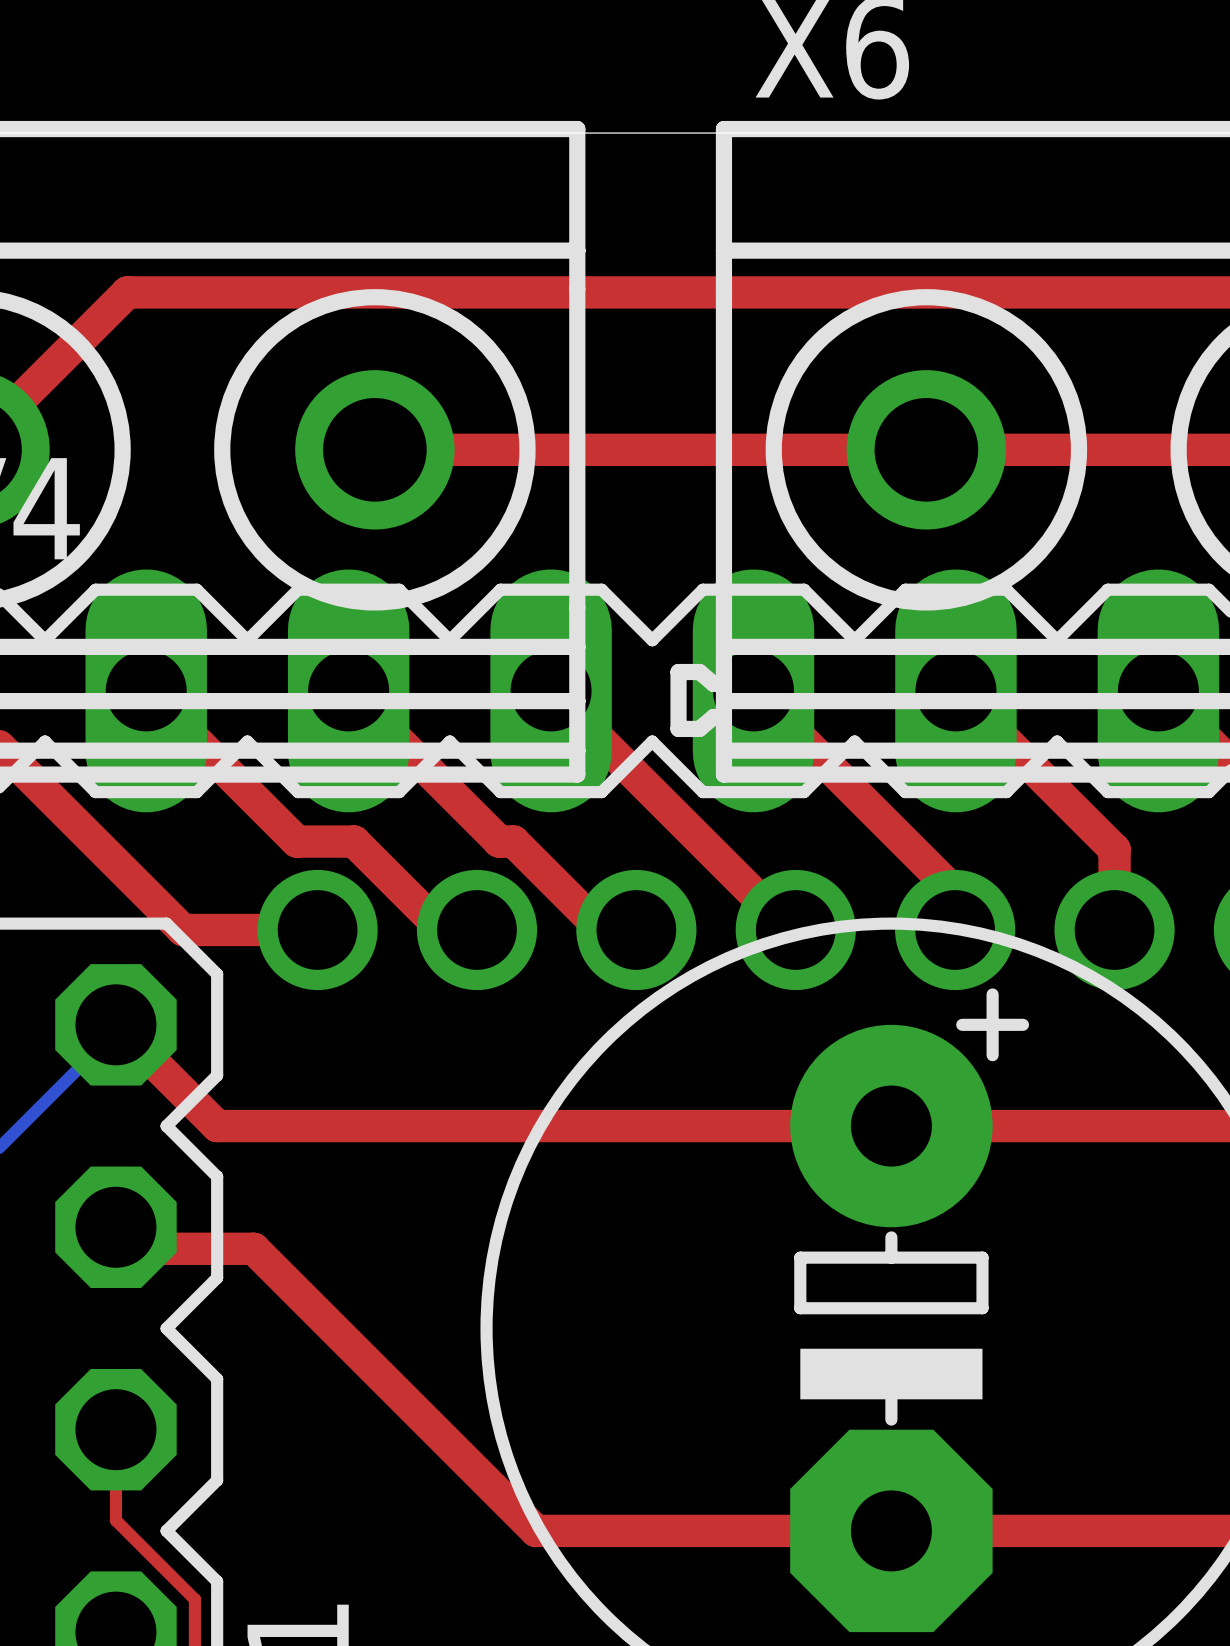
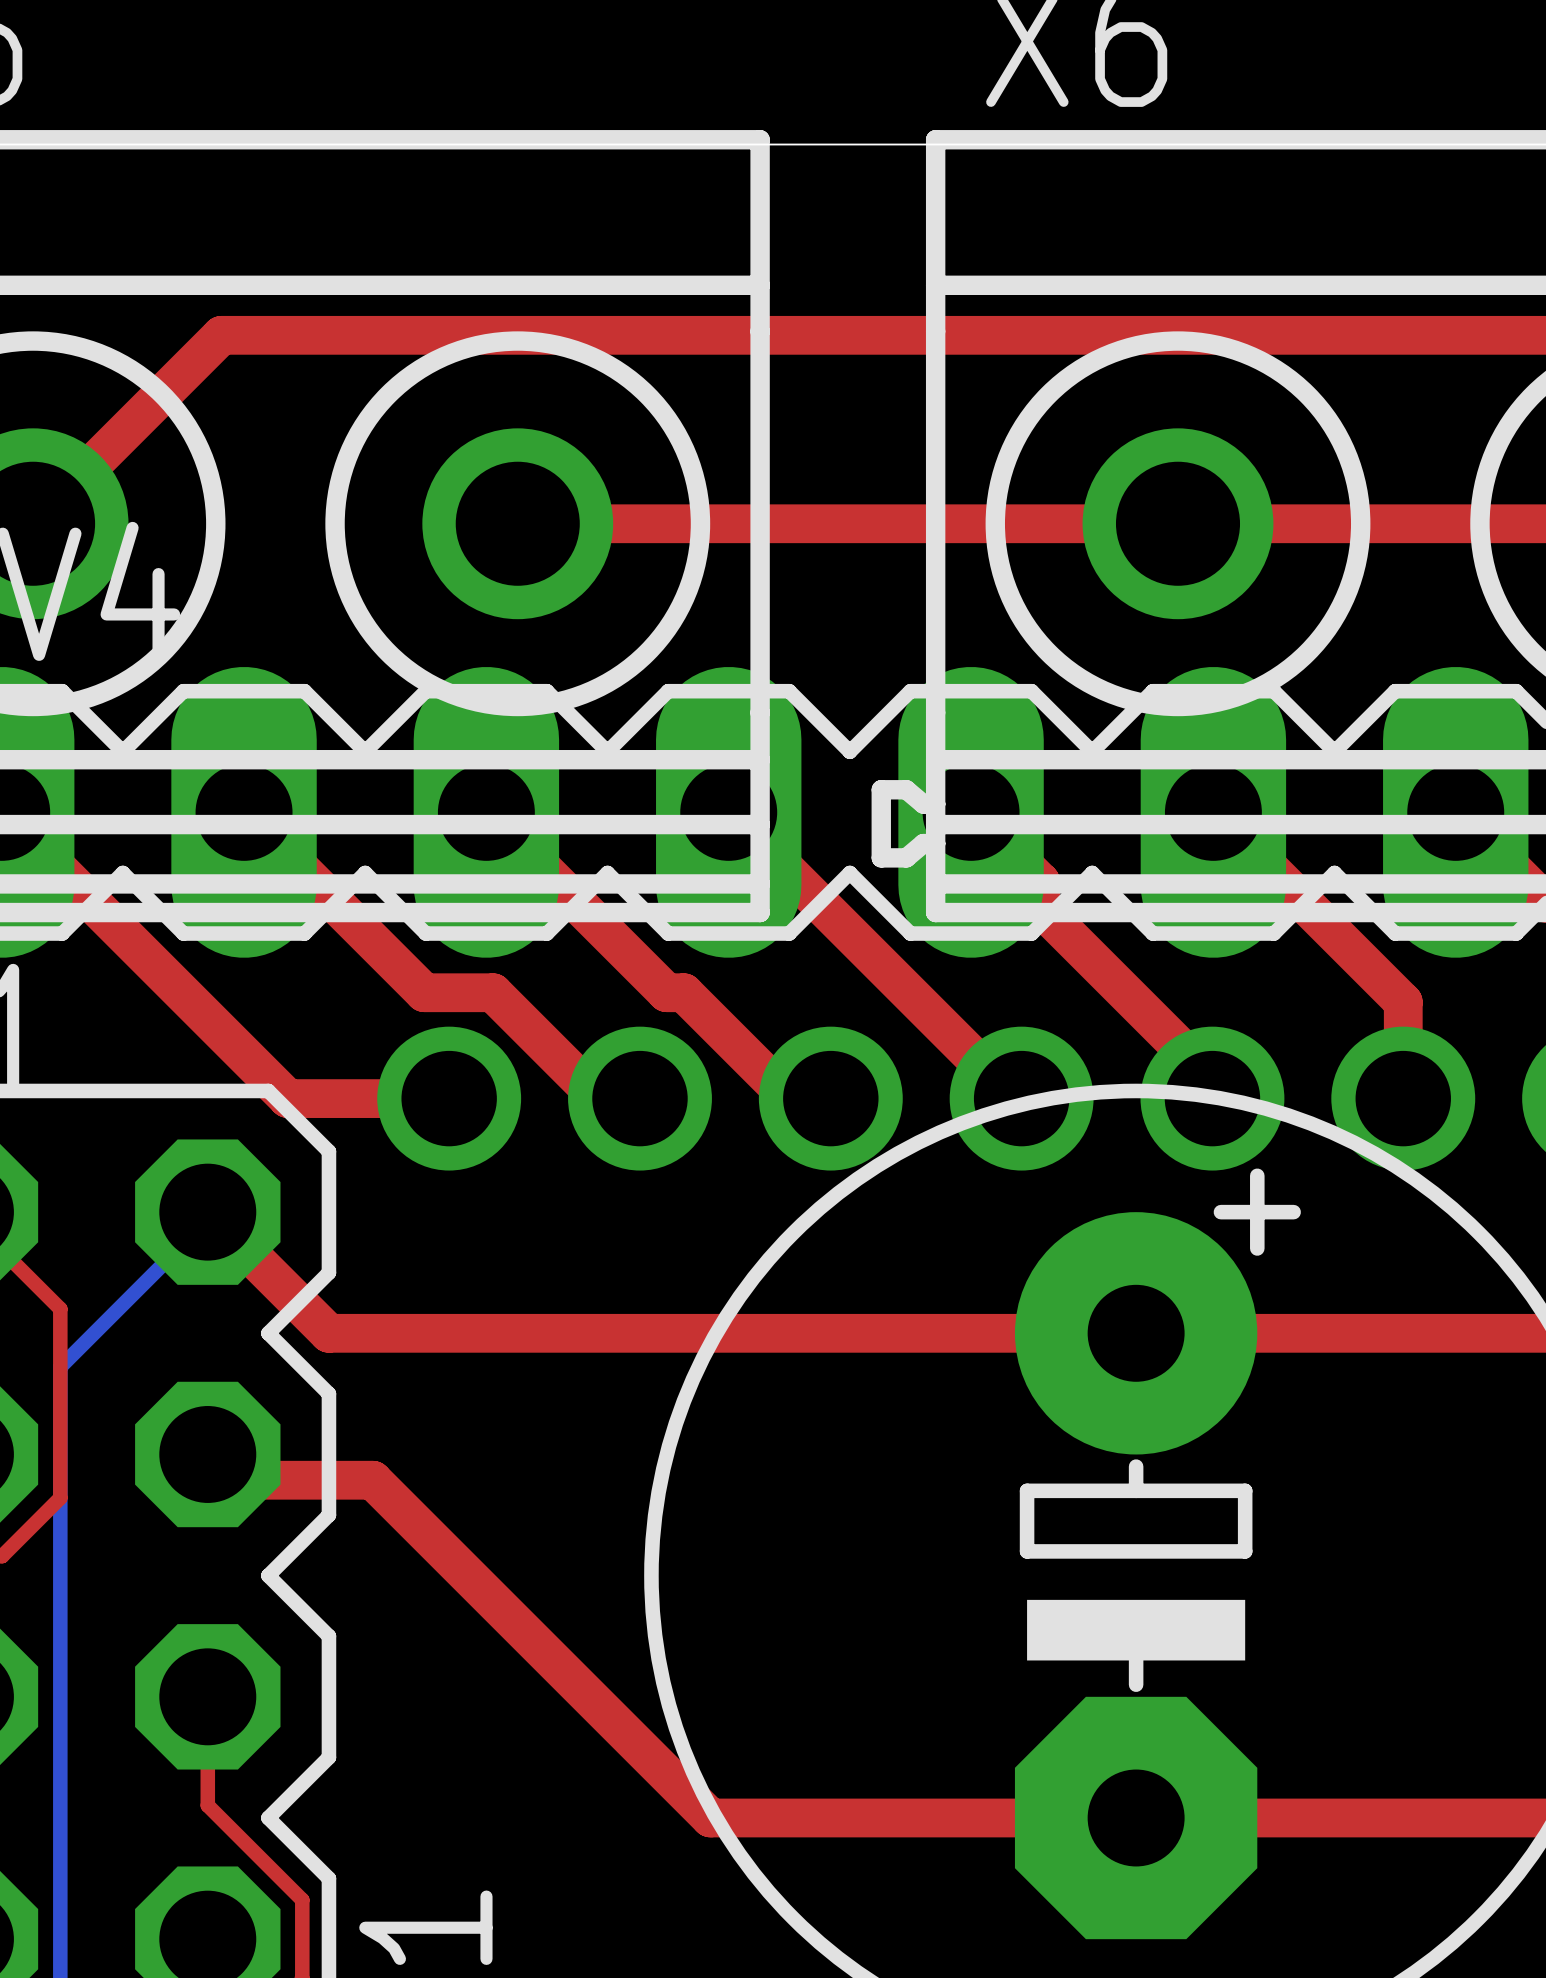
top track: (811, 749) (955, 892) (955, 914) -> (1040, 882) (1040, 907) (1212, 1079)

